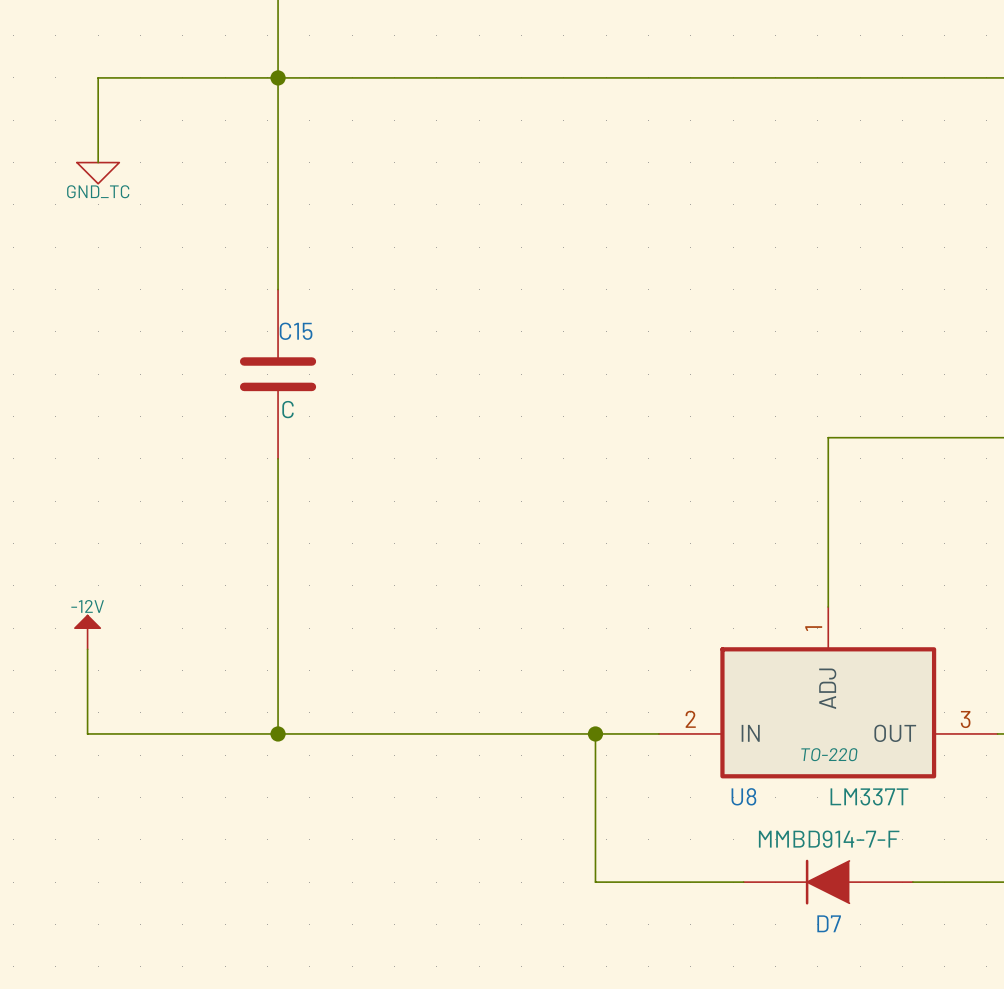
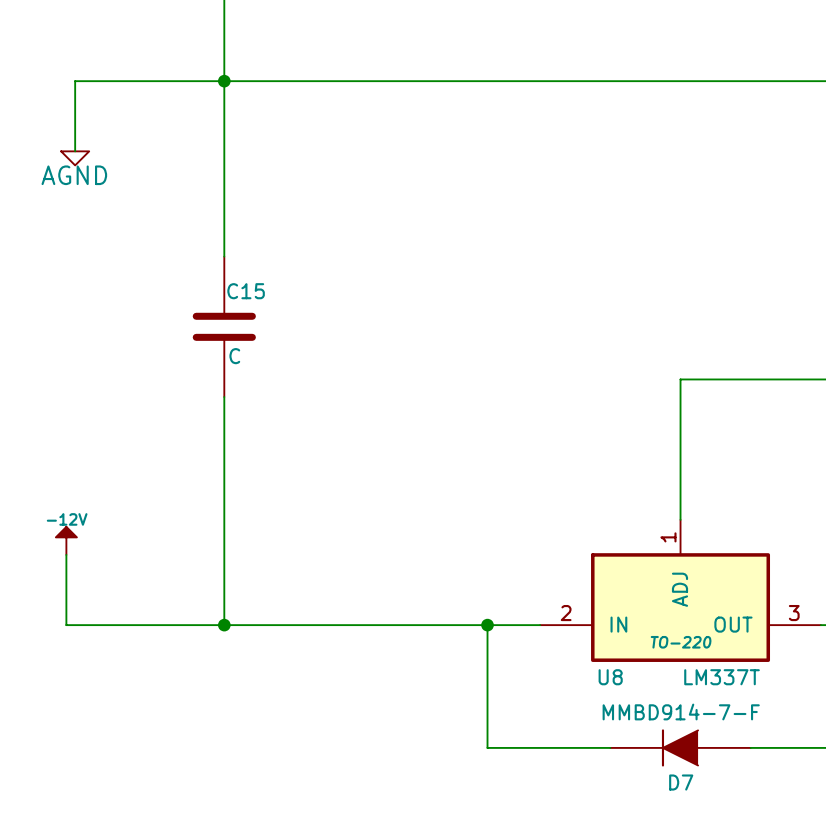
power symbol: GND_TC (98, 173) -> AGND (75, 158)

